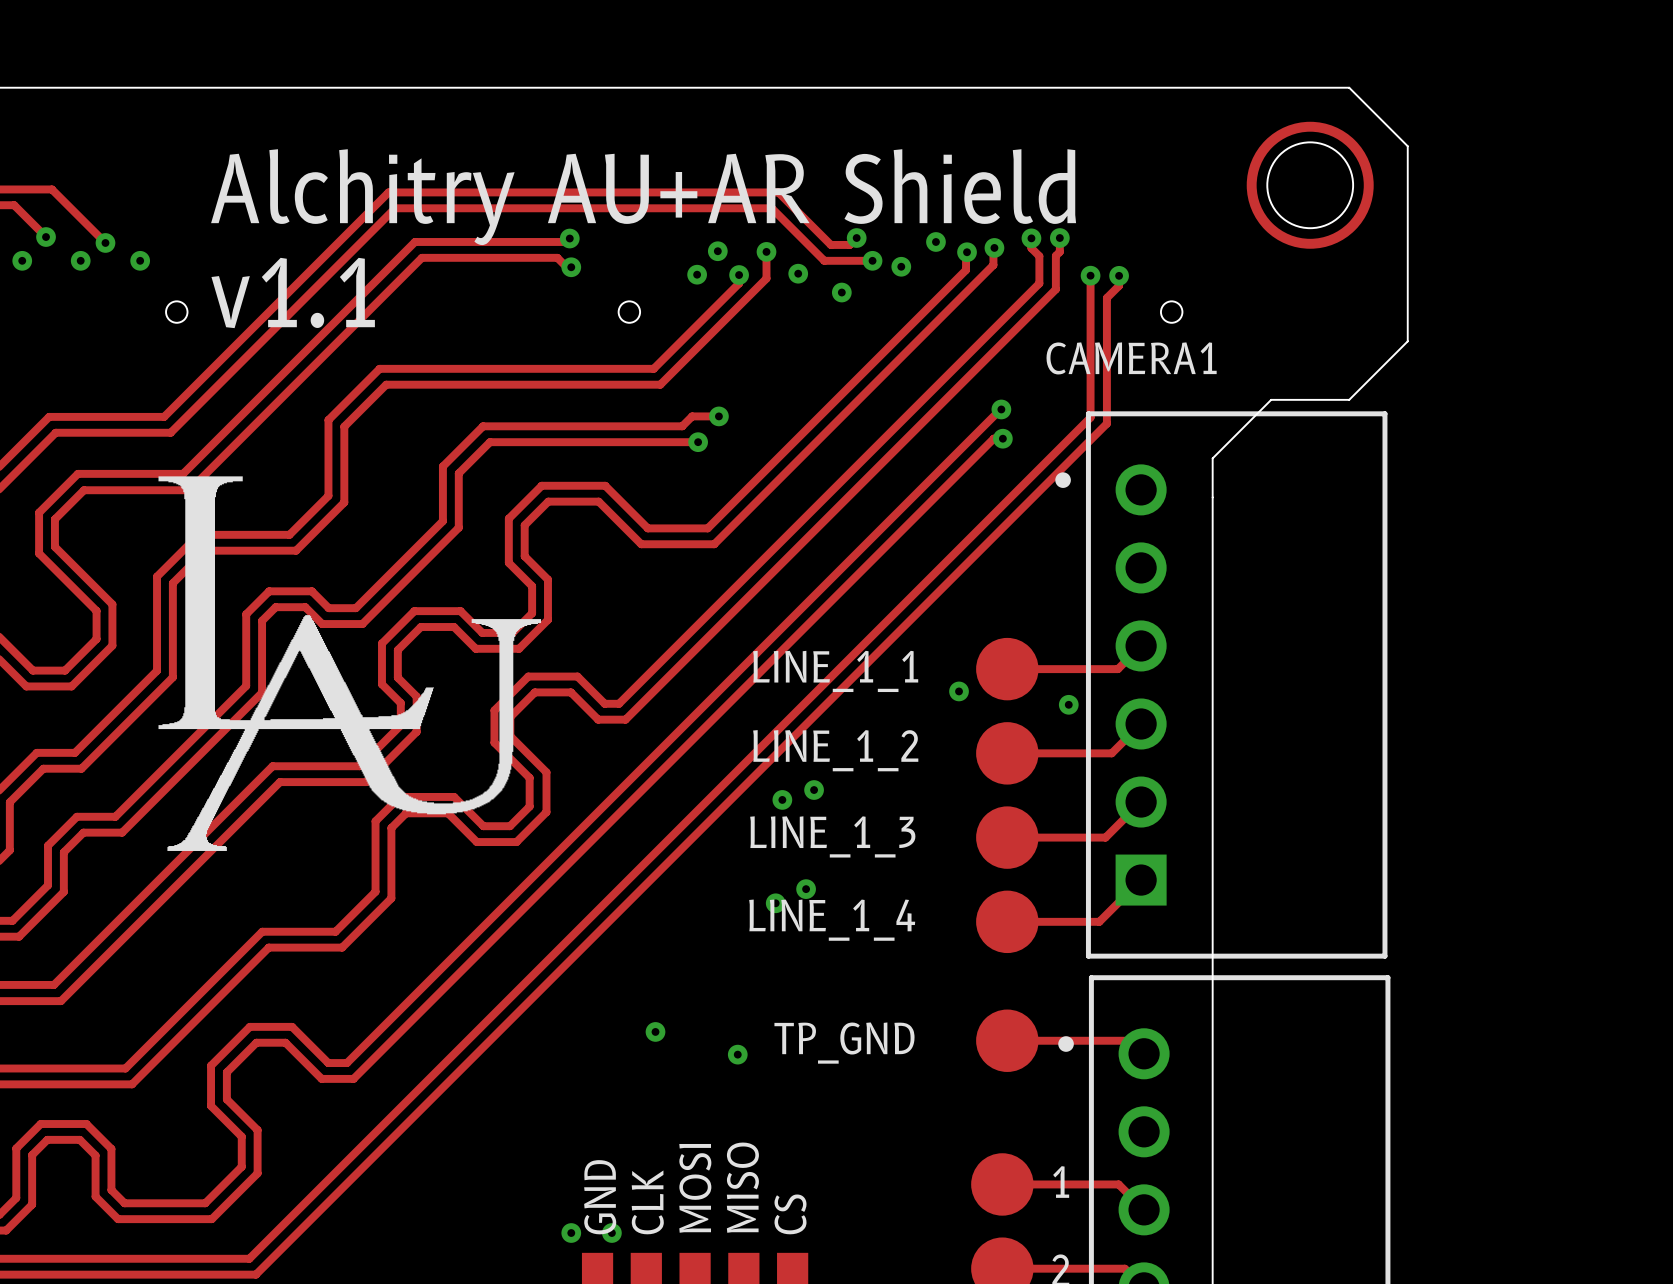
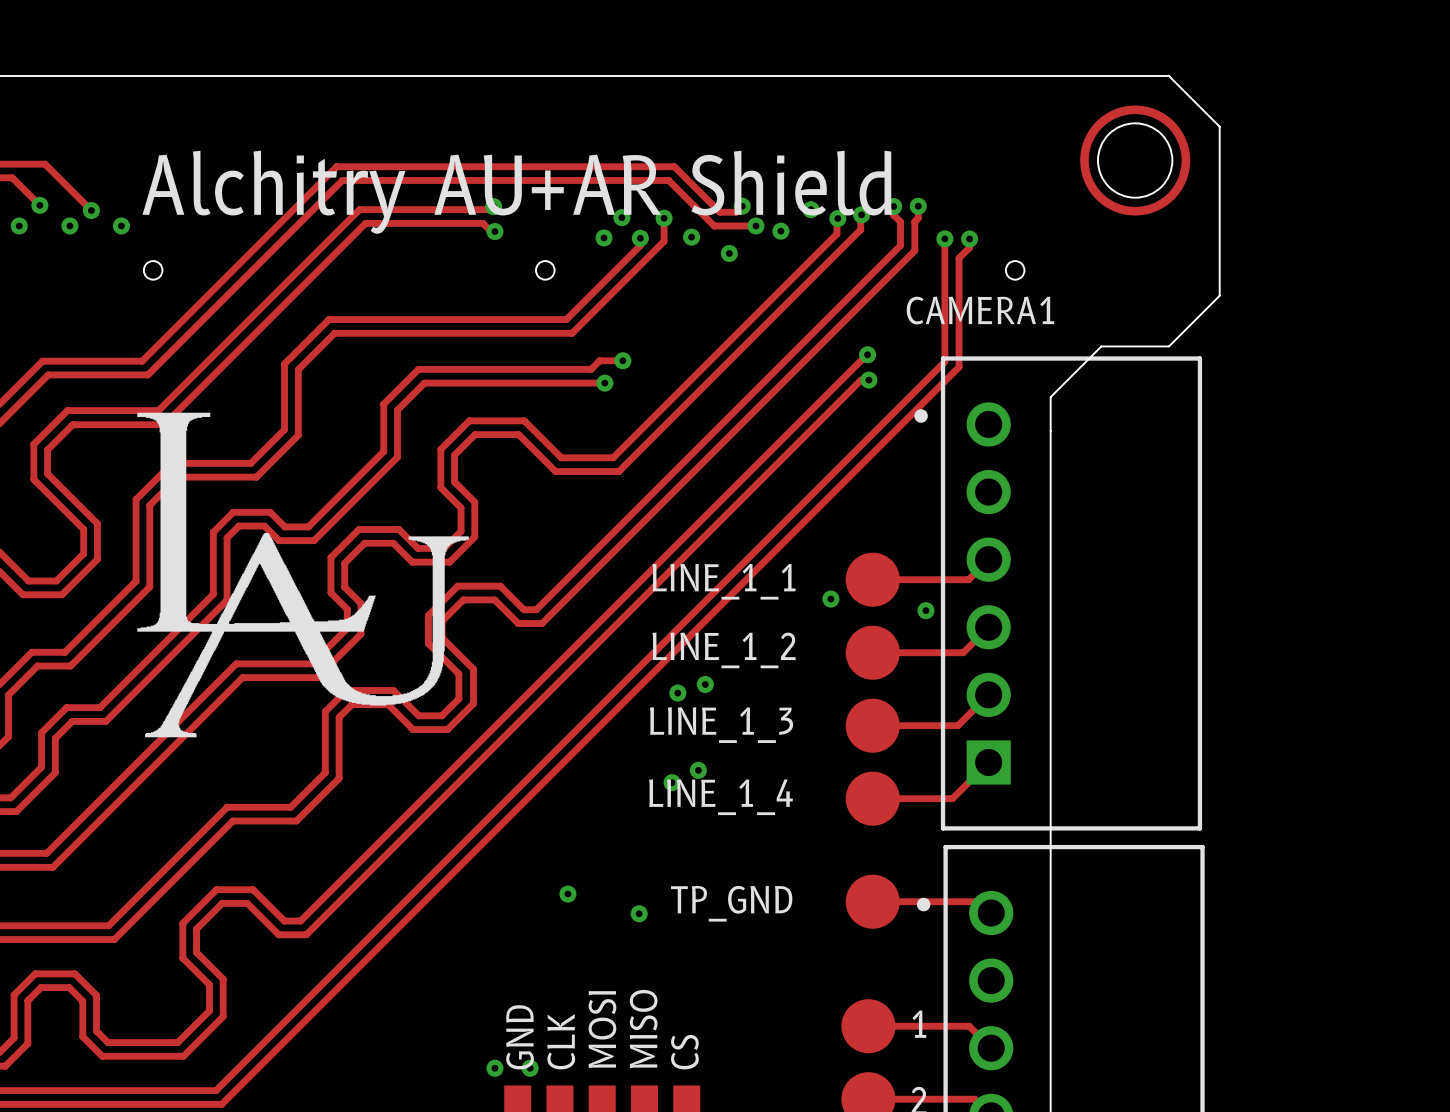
text position: Alchitry AU+AR Shield (643, 197) -> Alchitry AU+AR Shield (517, 192)
text: v1.1 (293, 292) -> none

